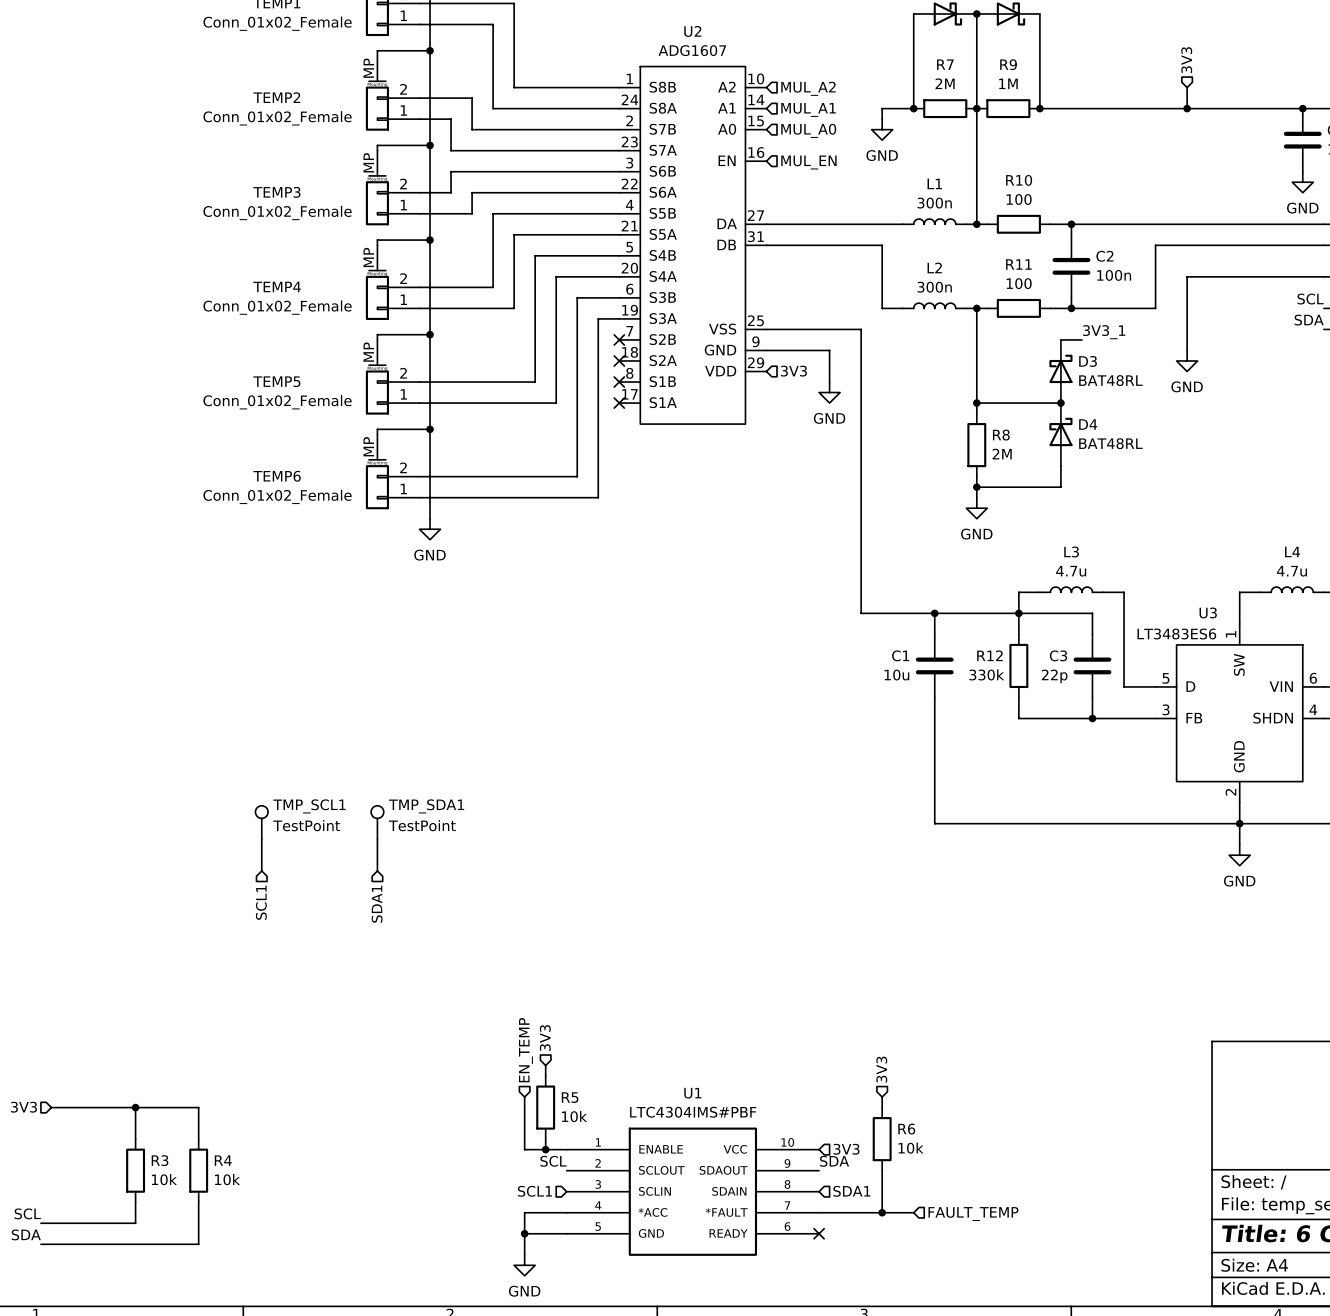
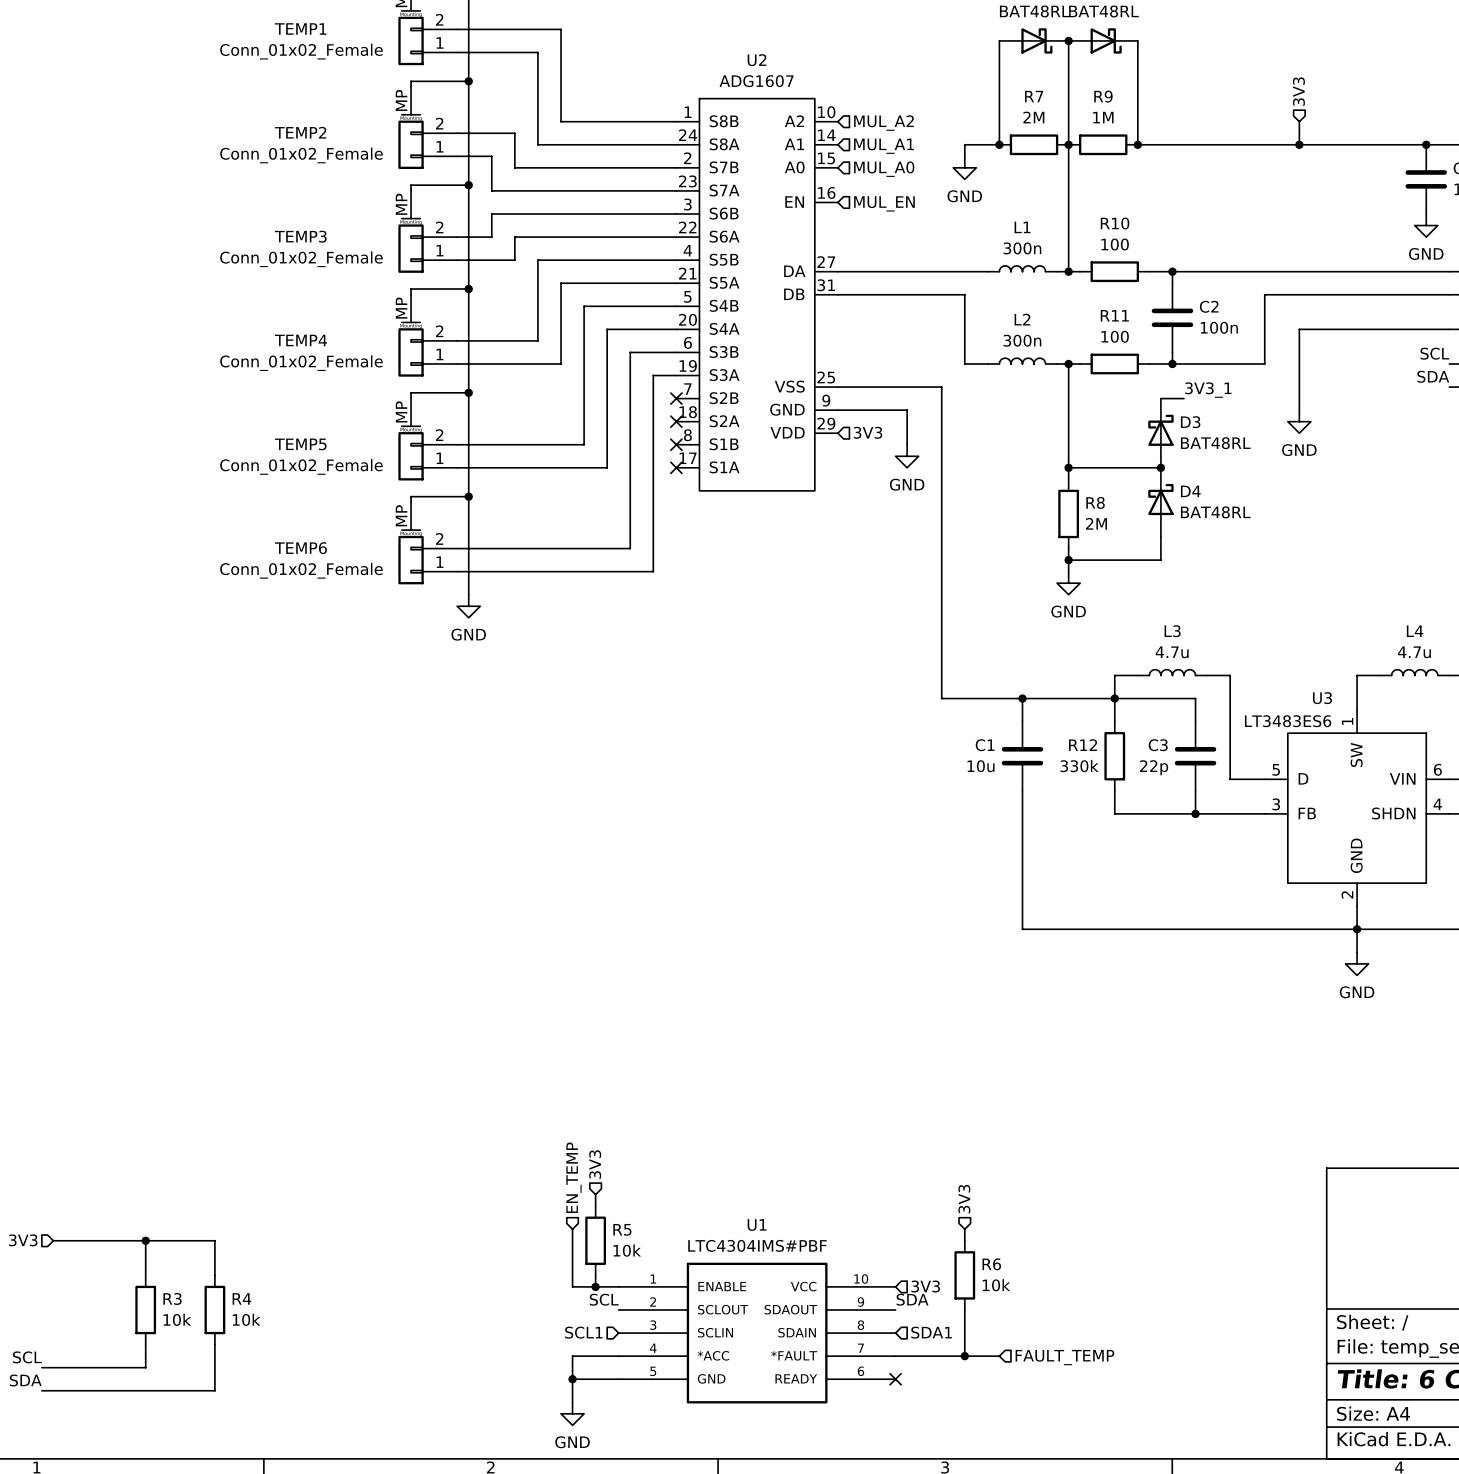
TMP_SCL1: TestPoint (261, 822) -> none
TMP_SDA1: TestPoint (377, 822) -> none
wire: (261, 839) (261, 870) -> none
wire: (377, 839) (377, 870) -> none
hierarchical label: SCL1 (261, 902) -> none
hierarchical label: SDA1 (377, 904) -> none

